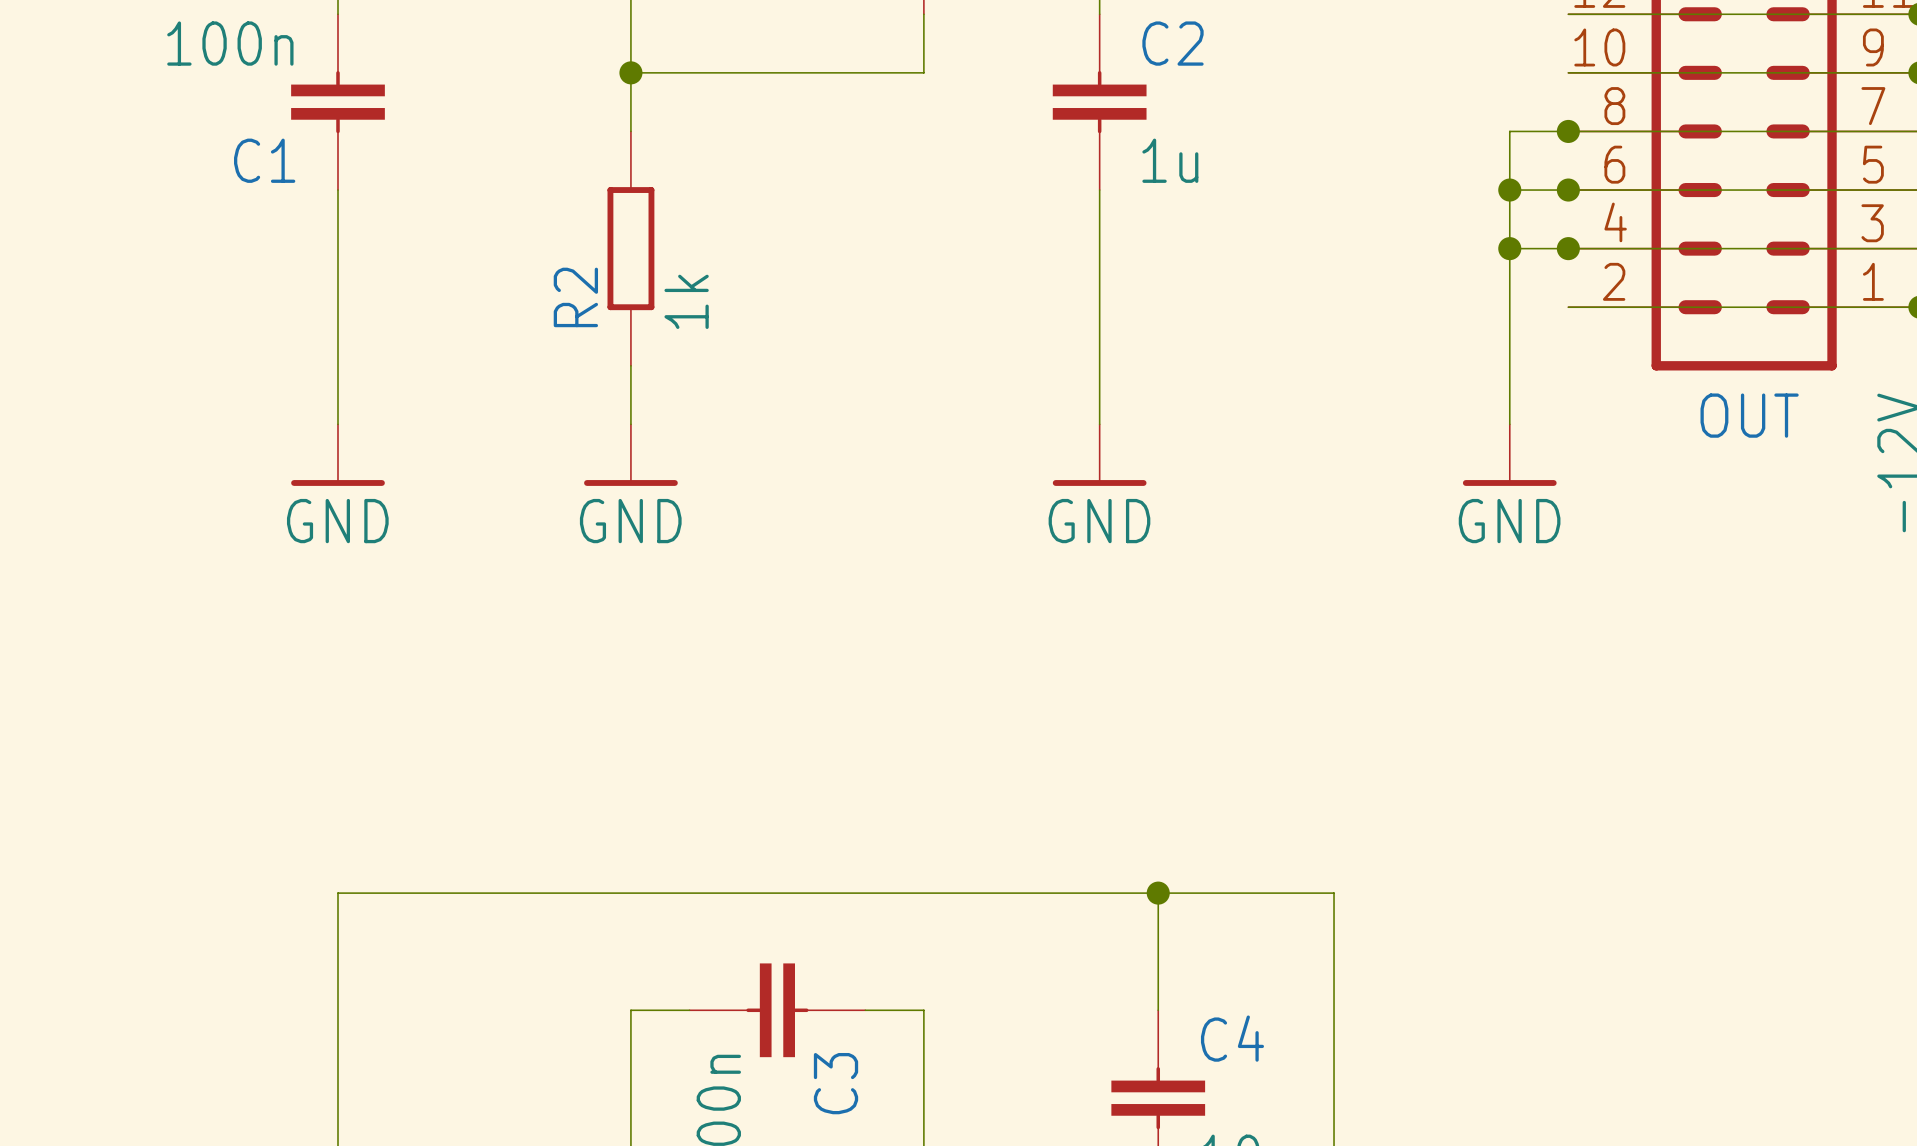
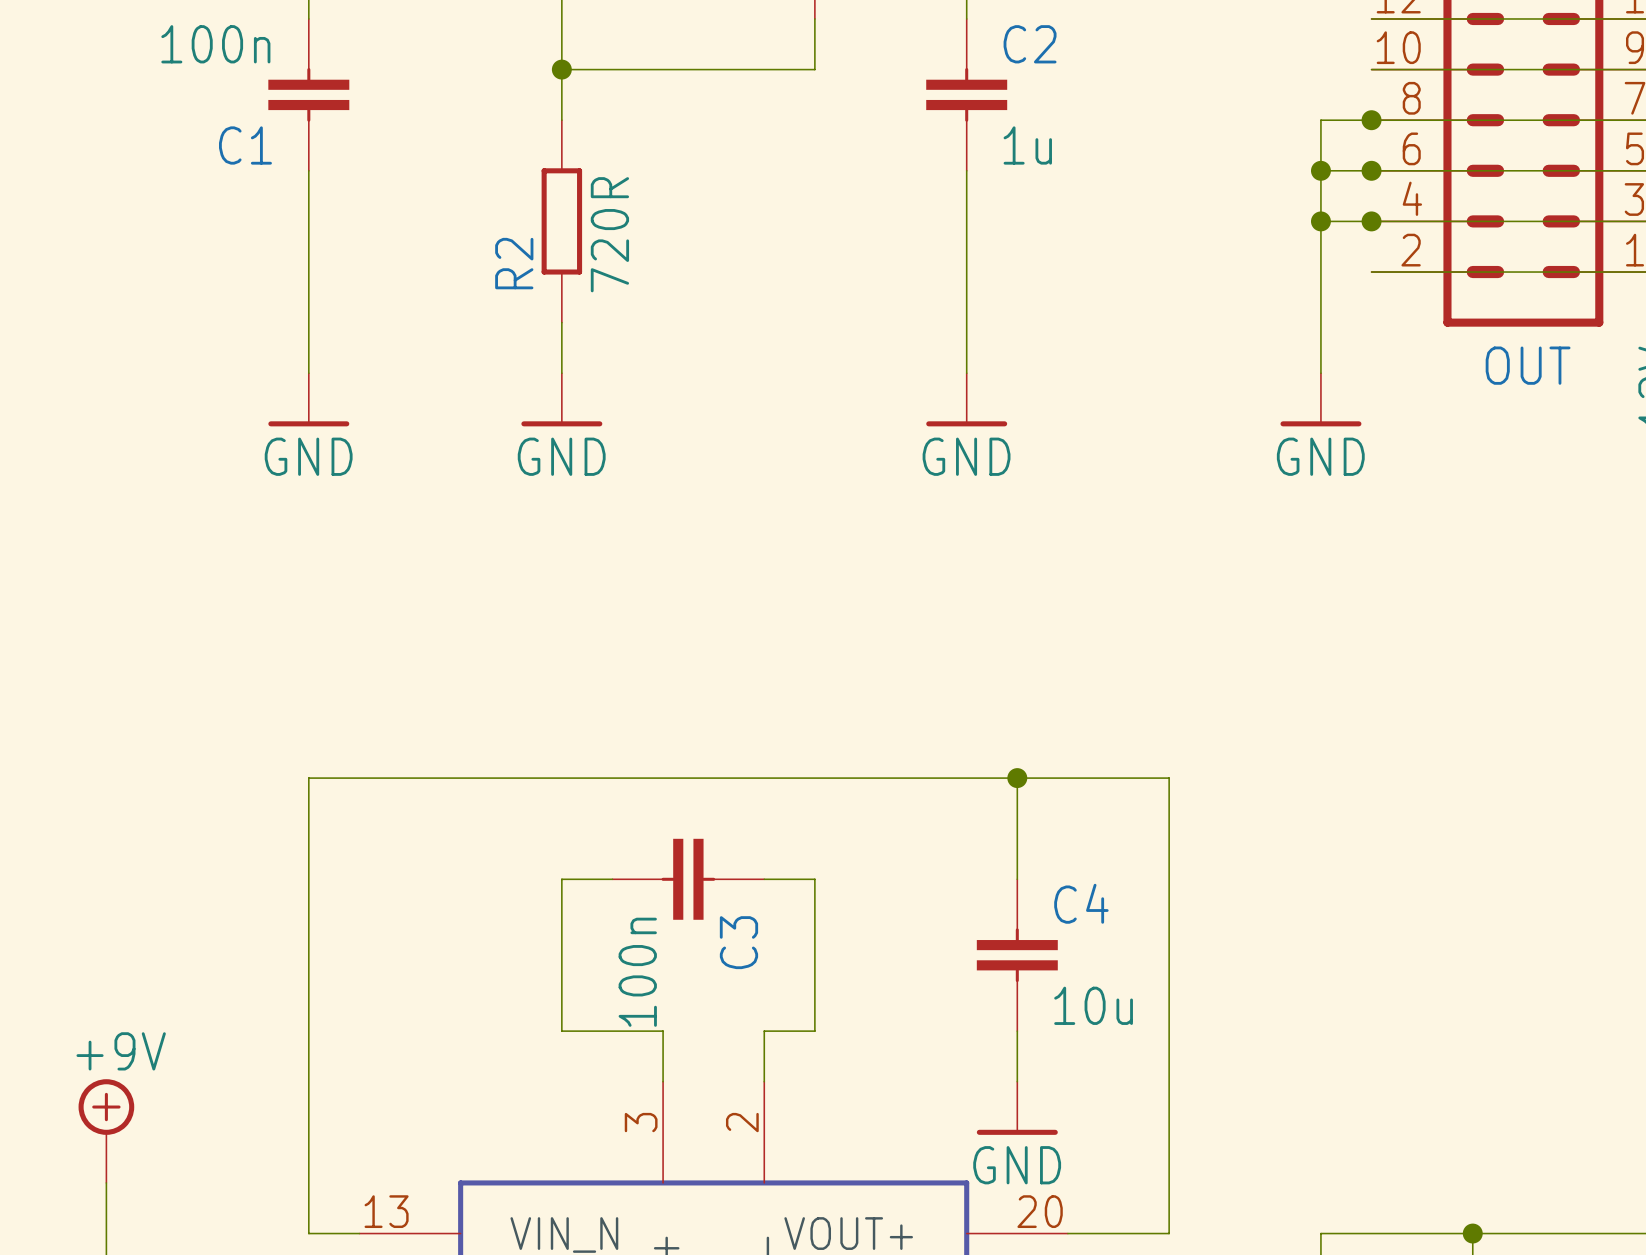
R2 value: 1k (686, 301) -> 720R (609, 234)

